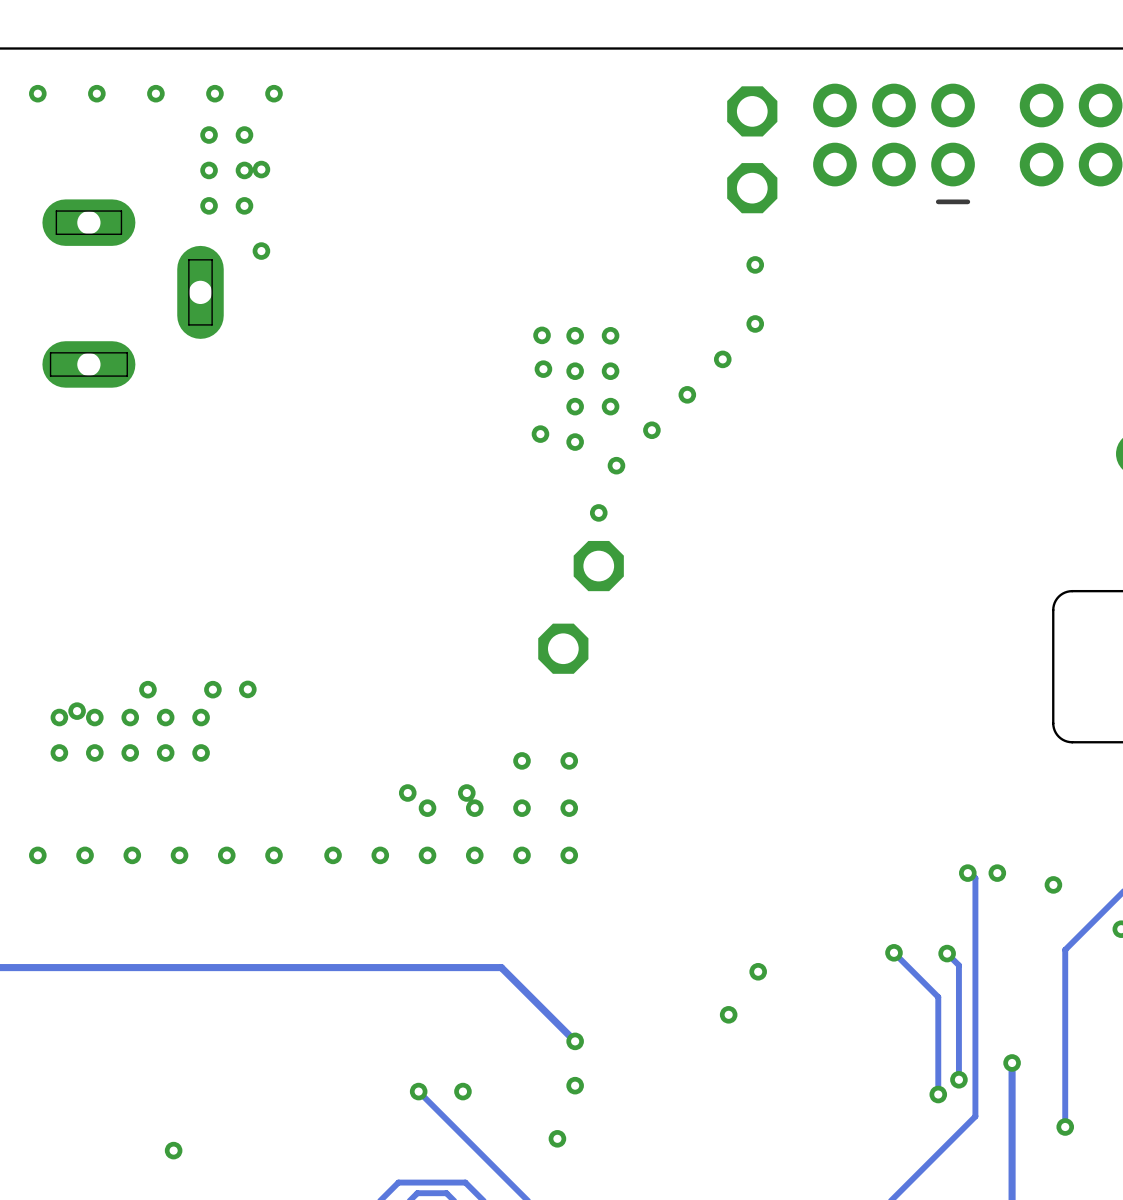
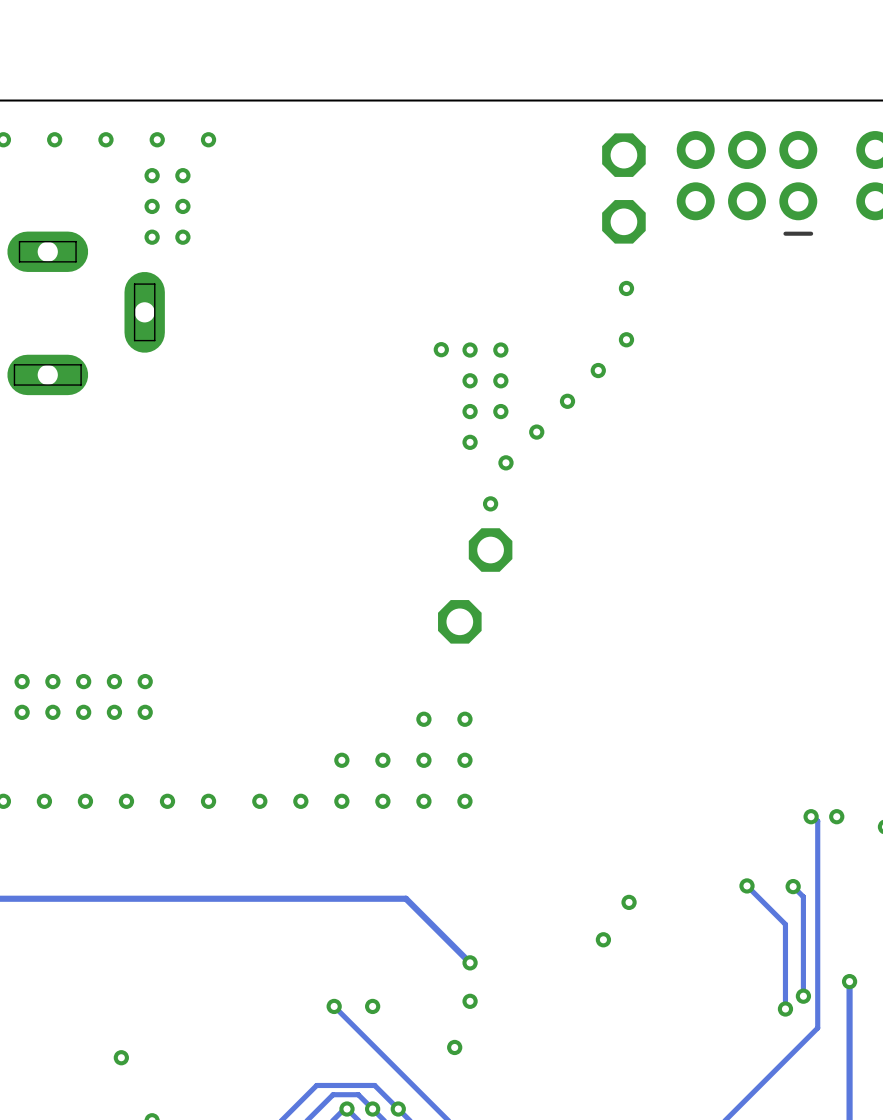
via: (261, 169) -> none
via: (261, 251) -> none
via: (543, 369) -> none
via: (540, 434) -> none
via: (147, 689) -> none
via: (212, 689) -> none
via: (247, 689) -> none
via: (77, 711) -> none
via: (407, 793) -> none
via: (466, 793) -> none

